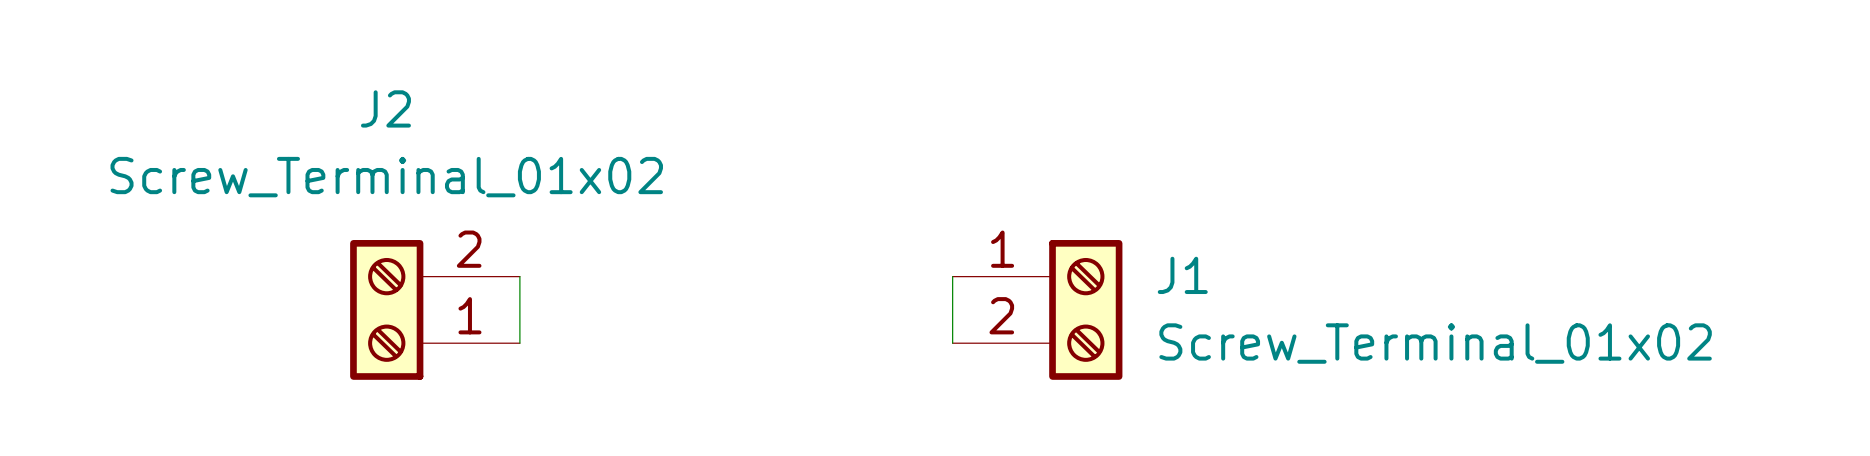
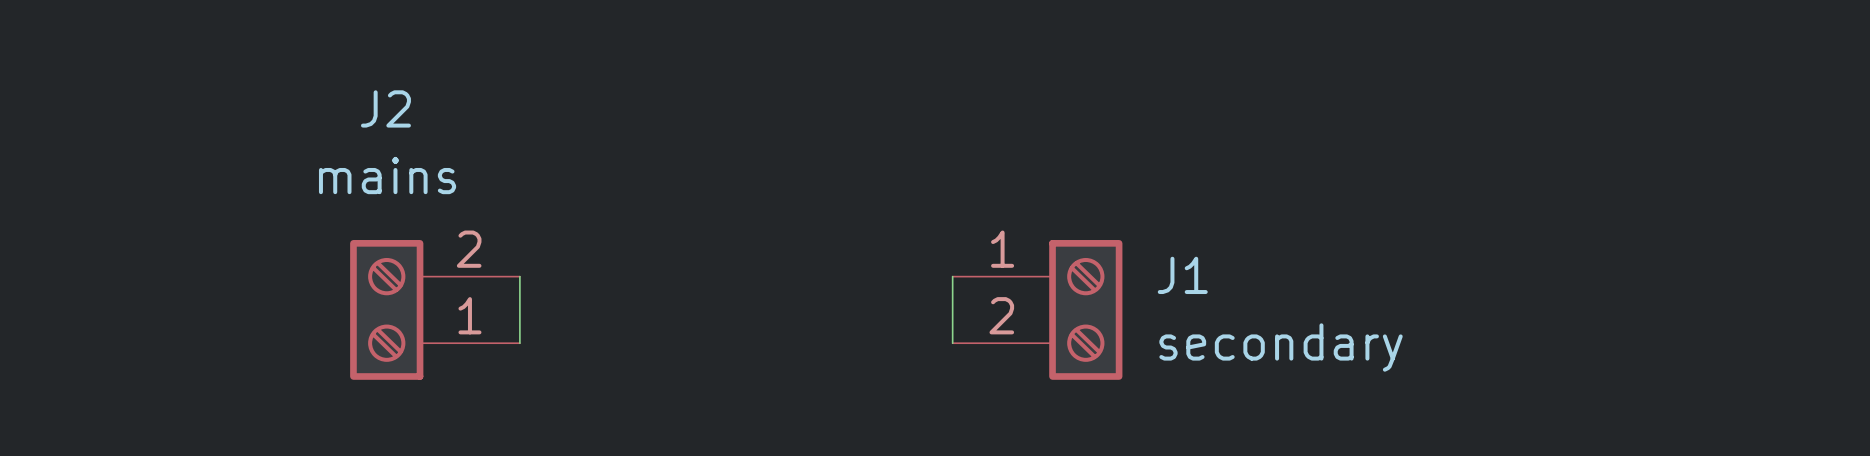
J2 value: Screw_Terminal_01x02 (386, 177) -> mains (387, 175)
J1 value: Screw_Terminal_01x02 (1435, 343) -> secondary (1281, 347)

